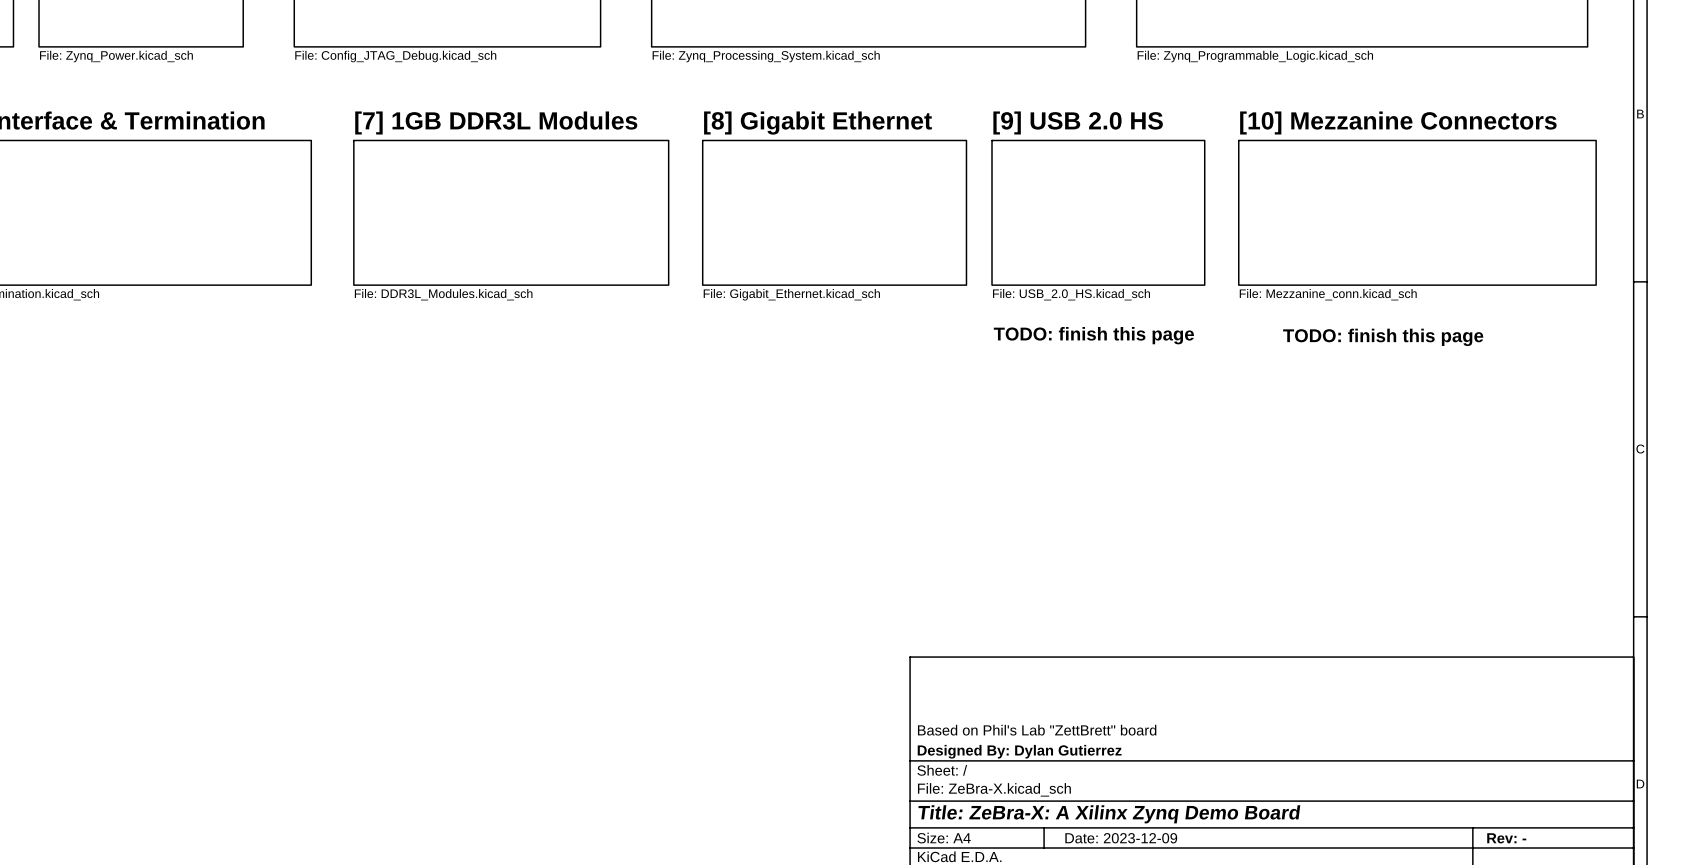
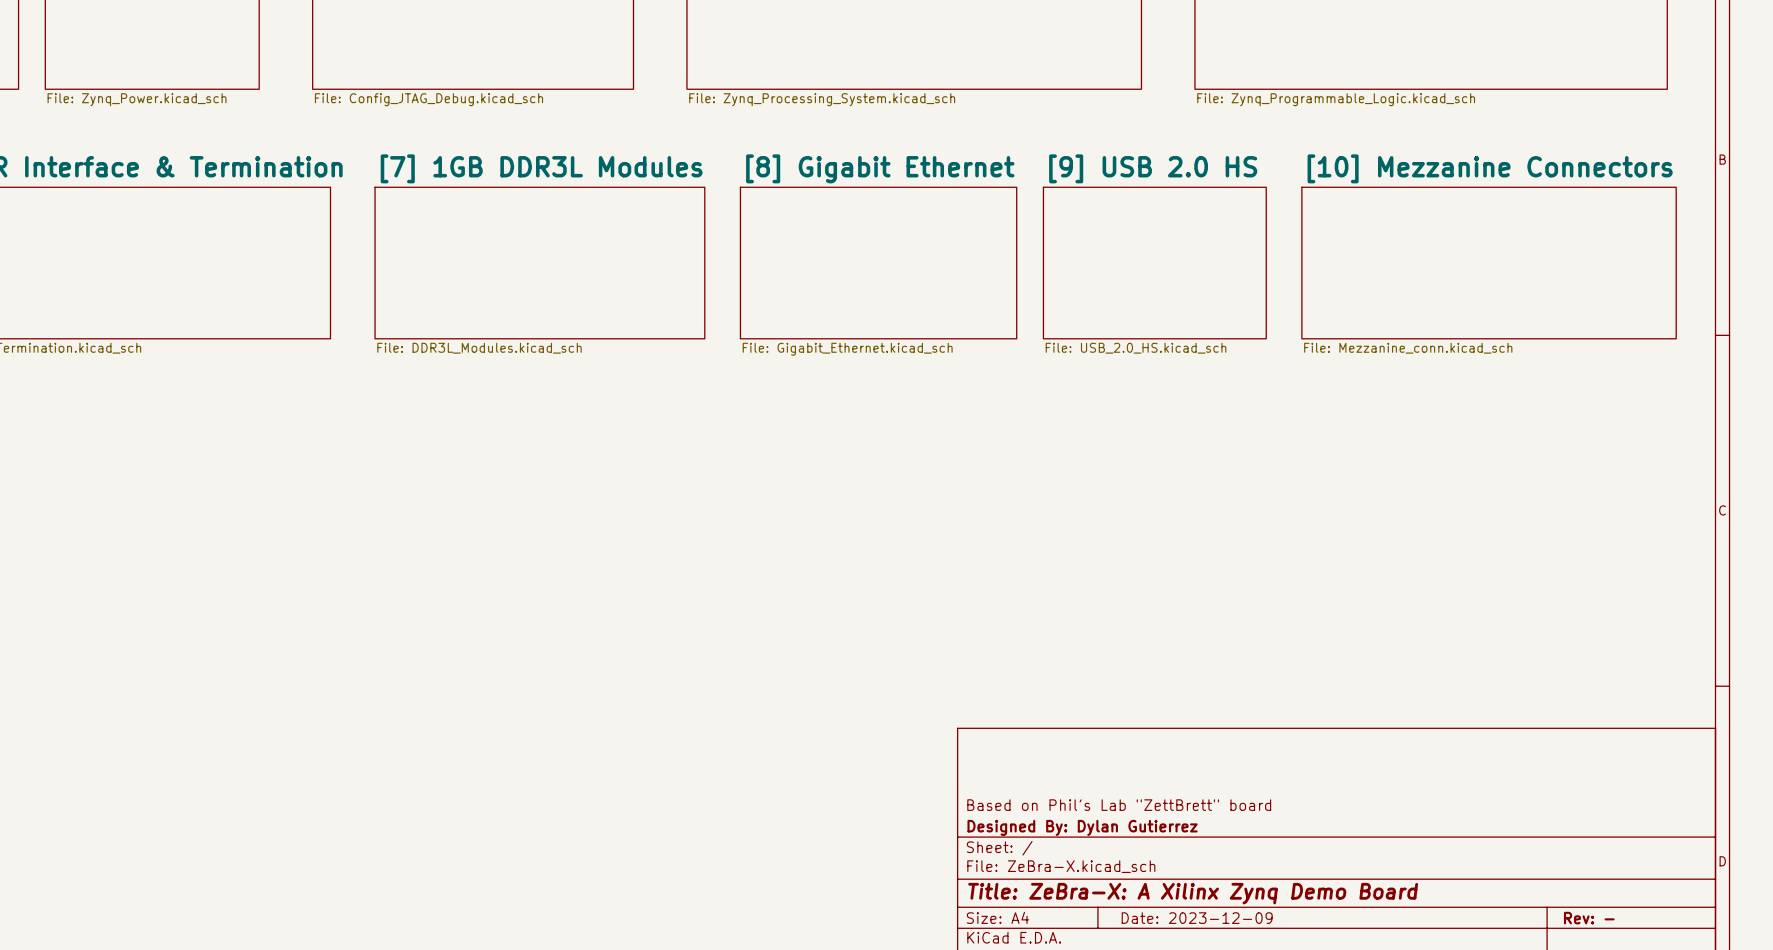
text: TODO: finish this page (1093, 335) -> none
text: TODO: finish this page (1383, 337) -> none

